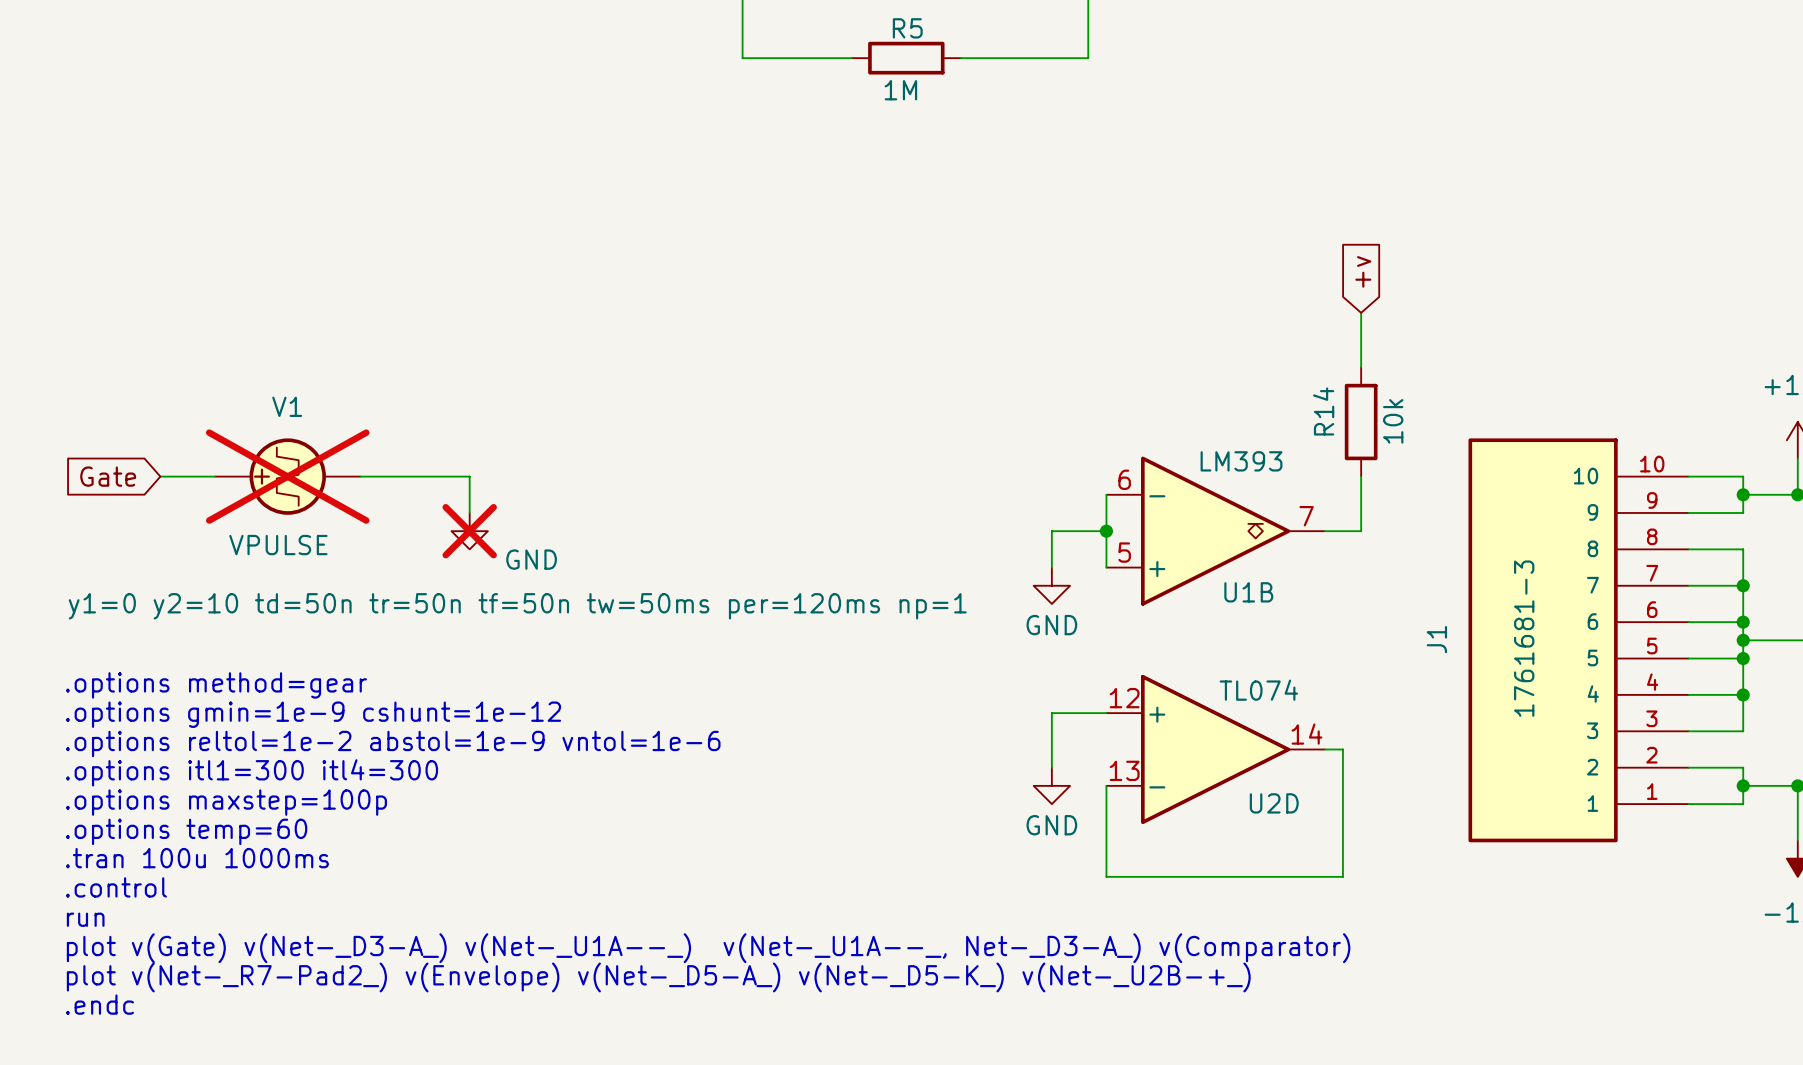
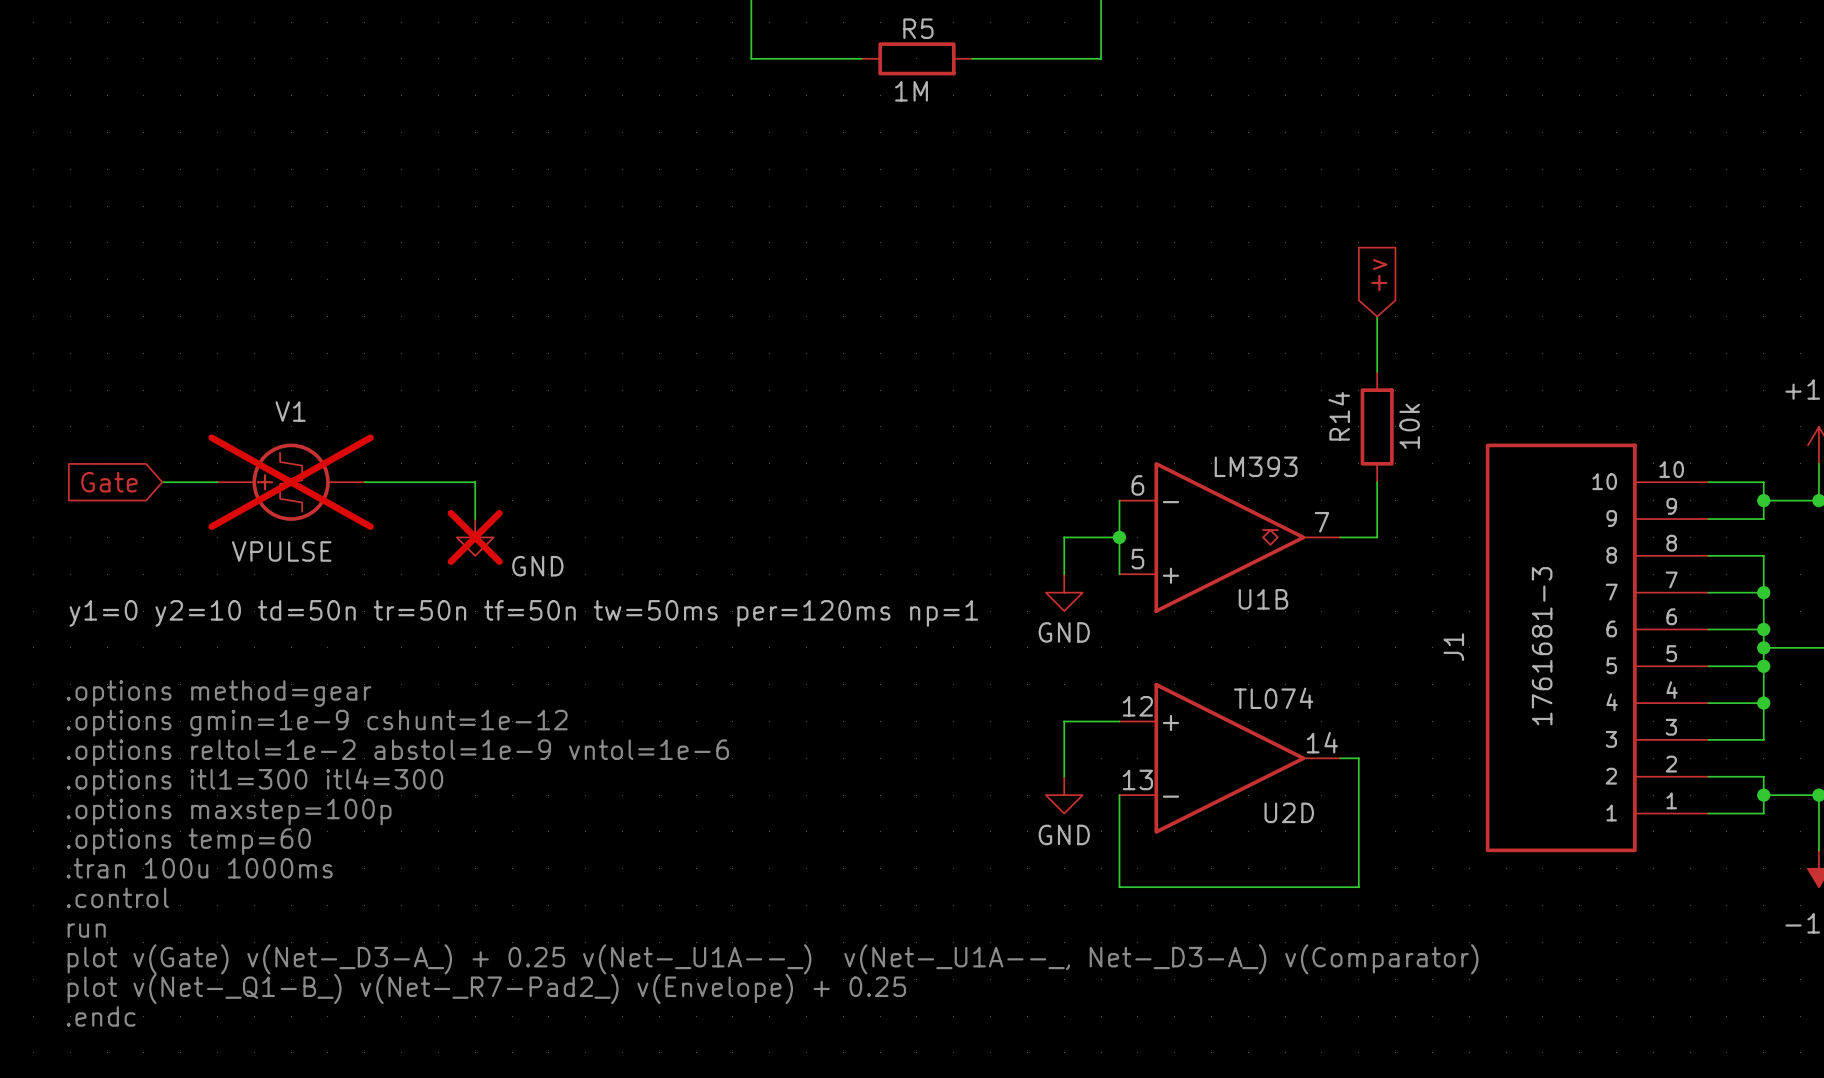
text: plot v(Gate) v(Net-_D3-A_) v(Net-_U1A--_) v(Net-_U1A--_, Net-_D3-A_) v(Comparator) (708, 948) -> plot v(Gate) v(Net-_D3-A_) + 0.25 v(Net-_U1A--_) v(Net-_U1A--_, Net-_D3-A_) v(Comparator) (773, 959)
text: plot v(Net-_R7-Pad2_) v(Envelope) v(Net-_D5-A_) v(Net-_D5-K_) v(Net-_U2B-+_) (658, 977) -> plot v(Net-_Q1-B_) v(Net-_R7-Pad2_) v(Envelope) + 0.25 (486, 988)

